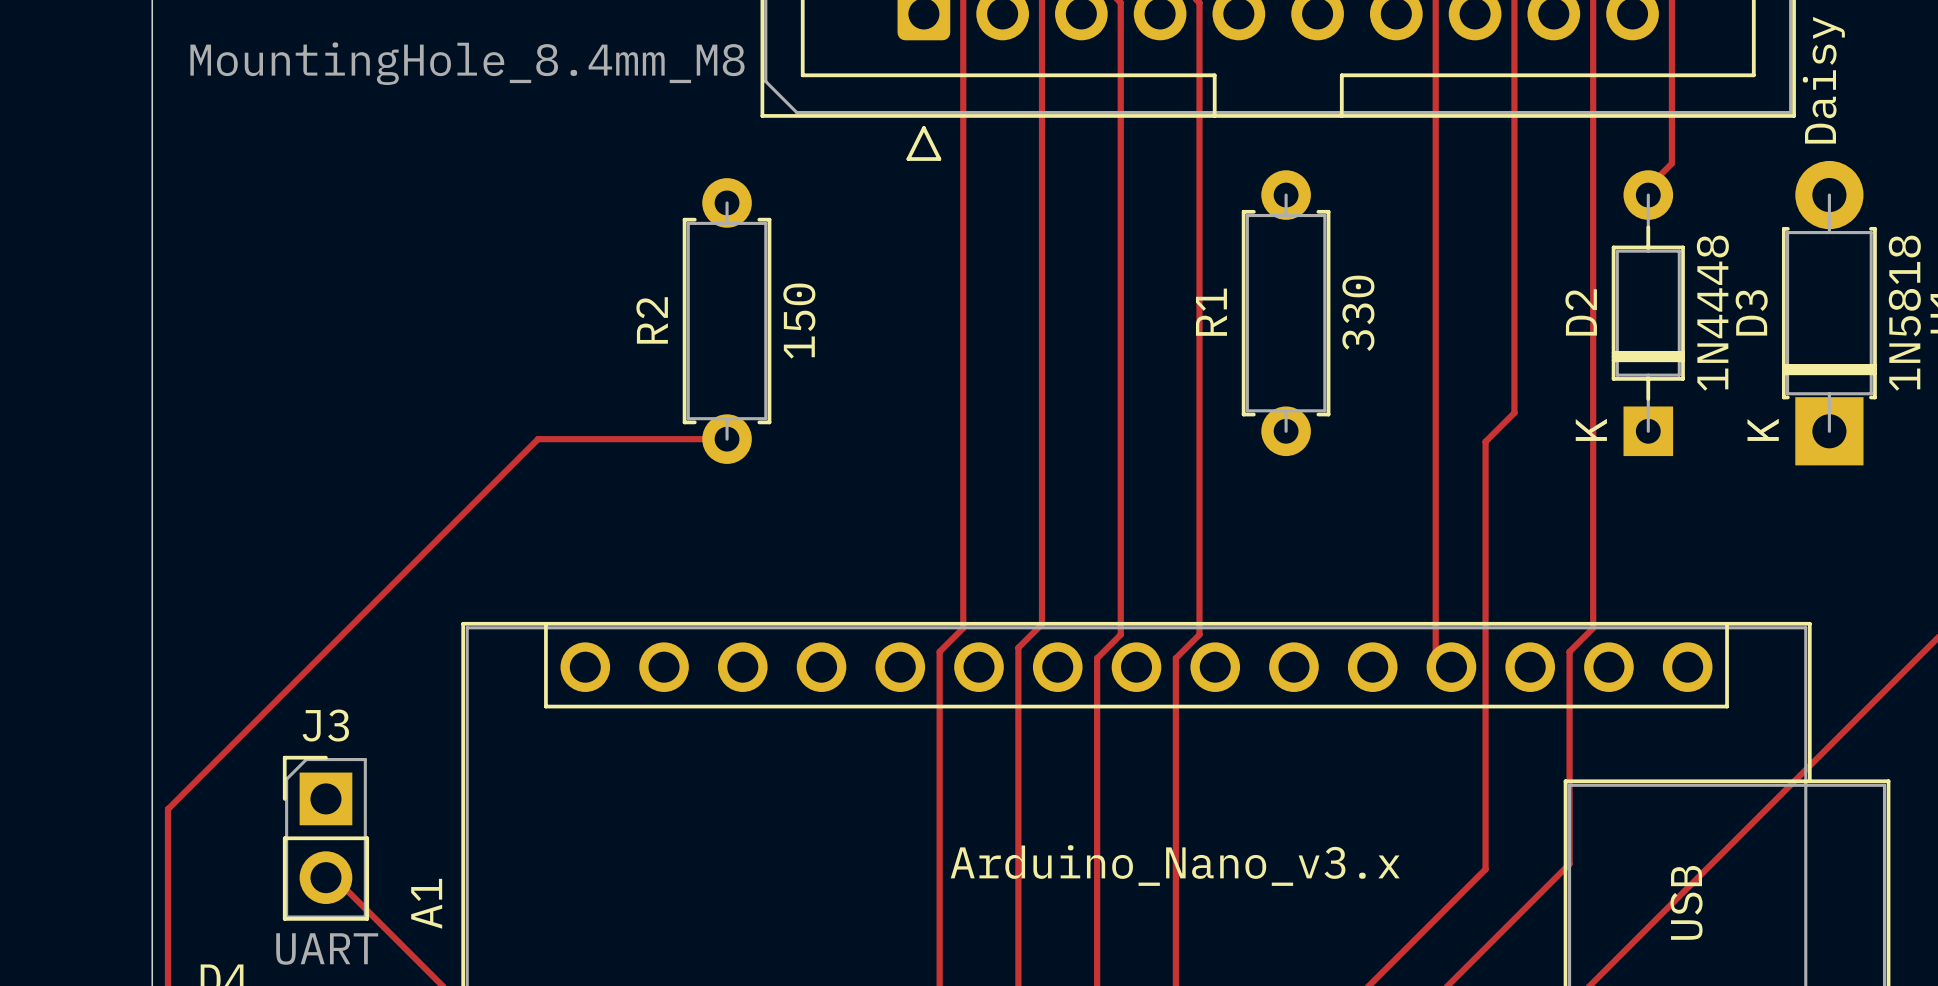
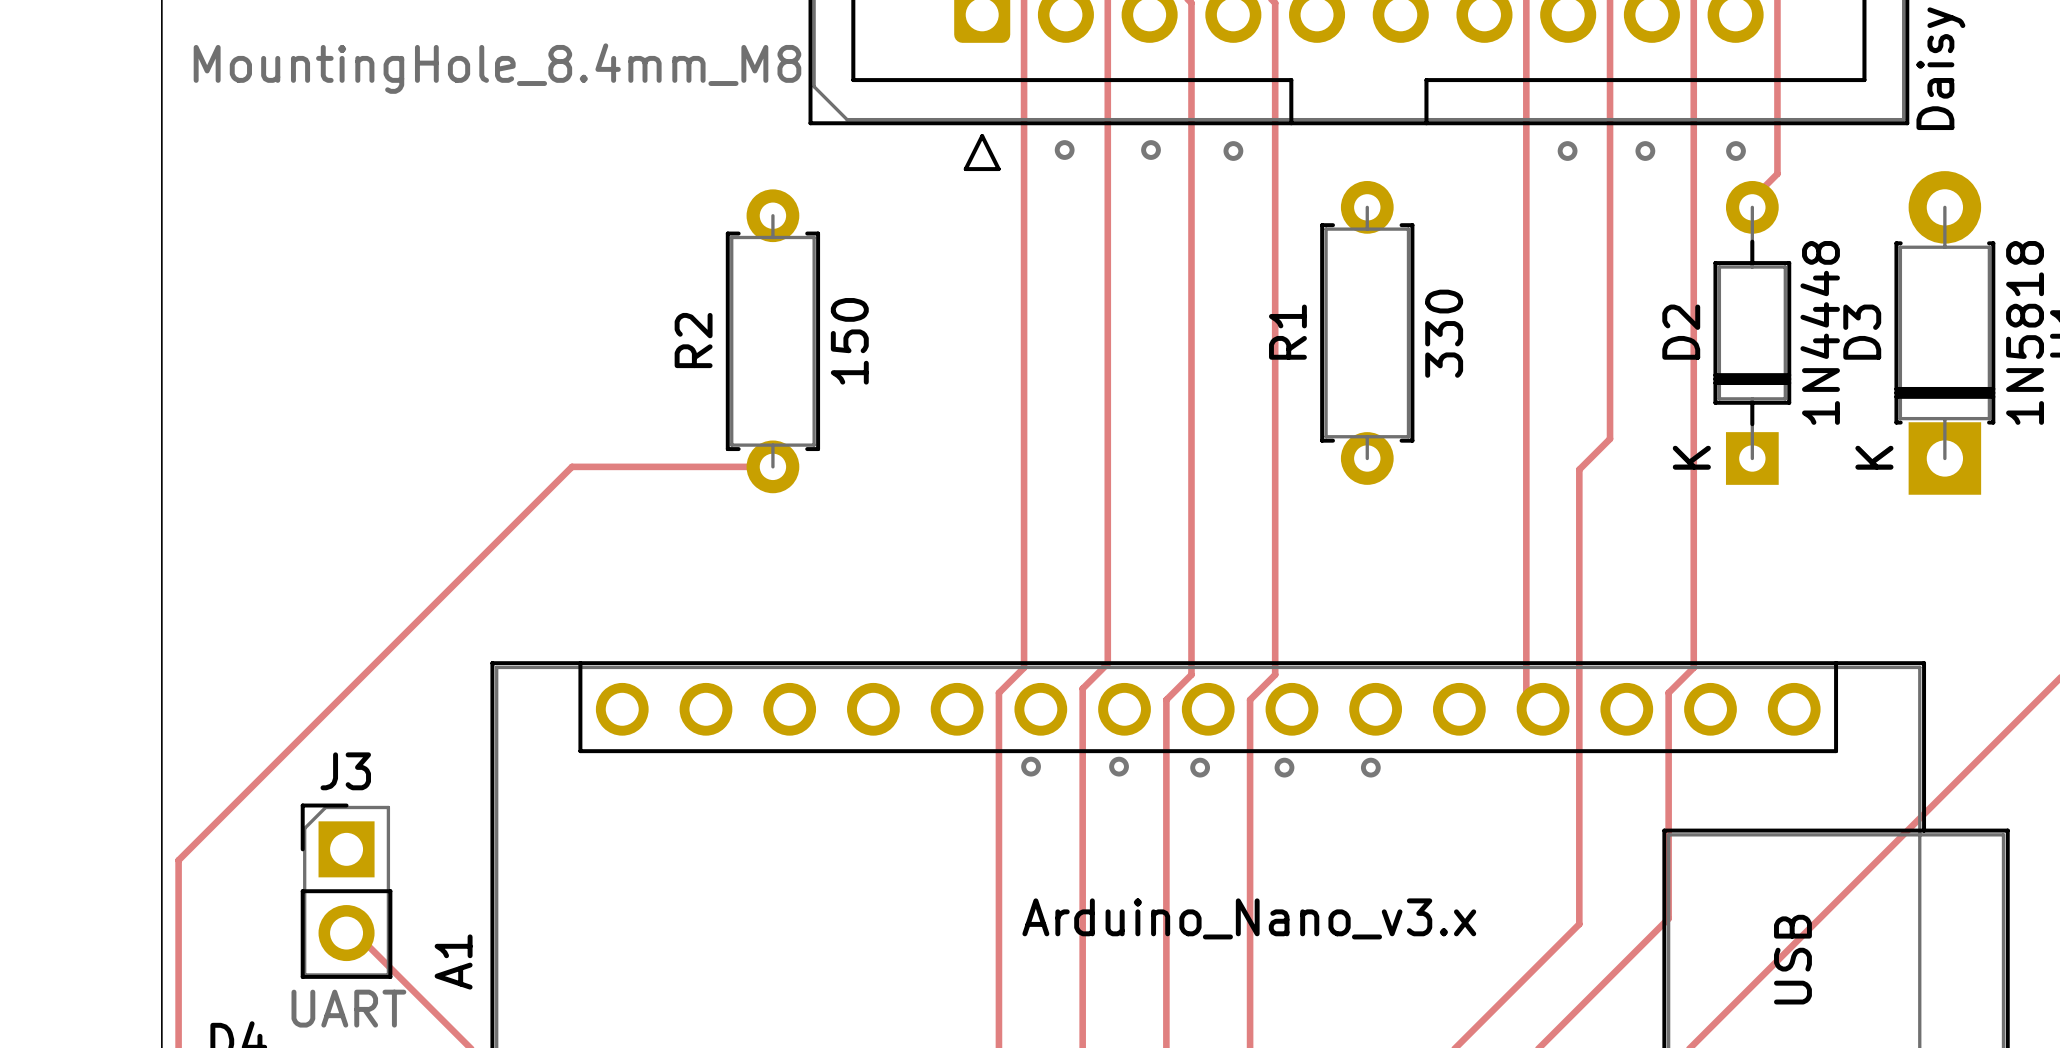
via: none -> (1064, 150)
via: none -> (1151, 150)
via: none -> (1233, 151)
via: none -> (1567, 151)
via: none -> (1645, 151)
via: none -> (1735, 151)
via: none -> (1031, 766)
via: none -> (1119, 766)
via: none -> (1200, 767)
via: none -> (1284, 767)
via: none -> (1370, 767)

